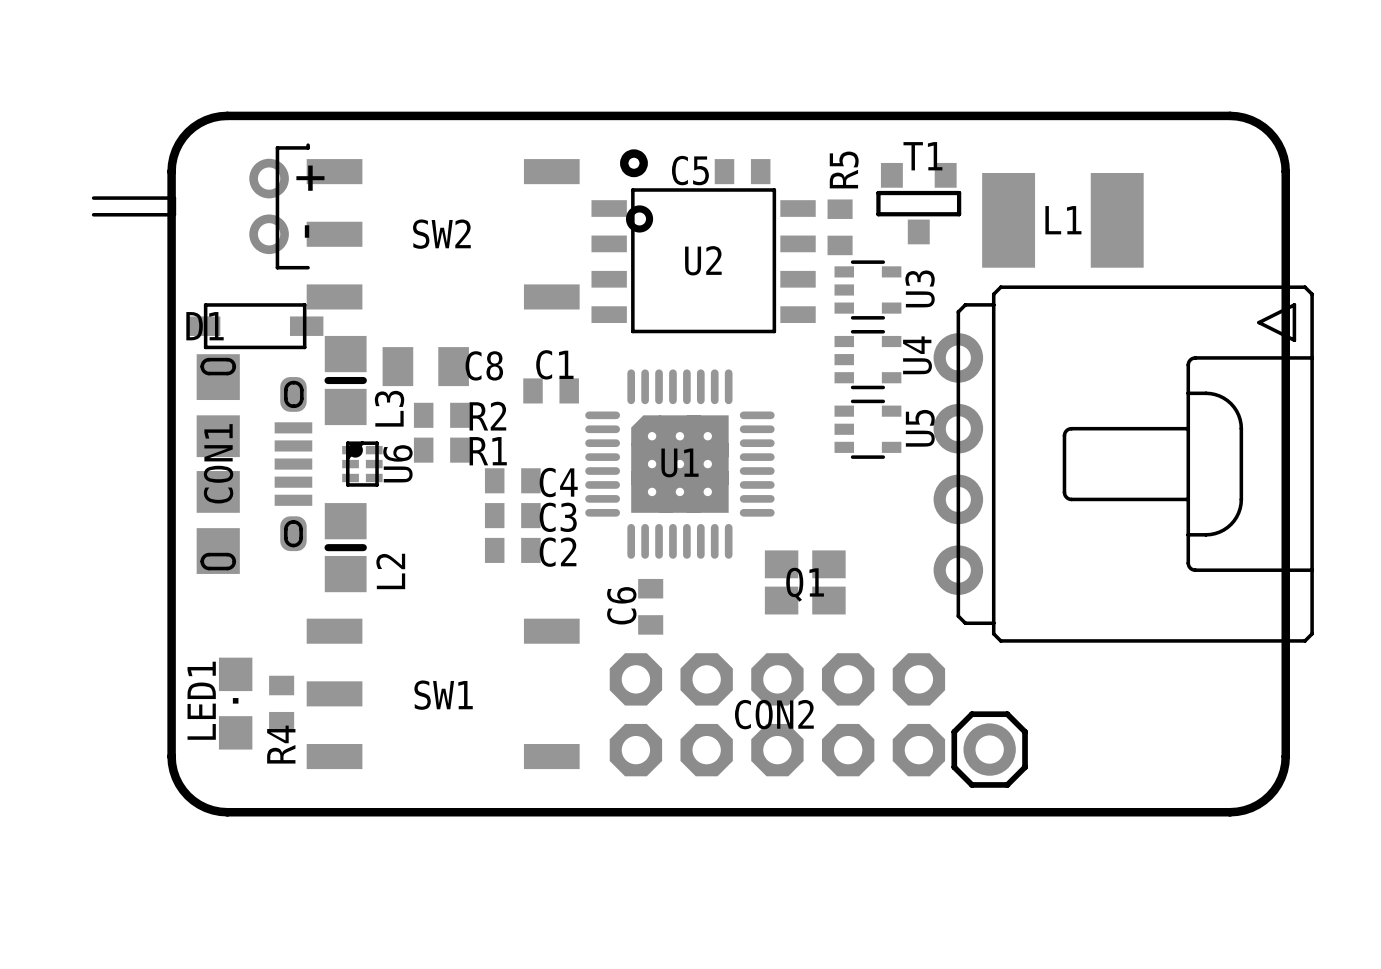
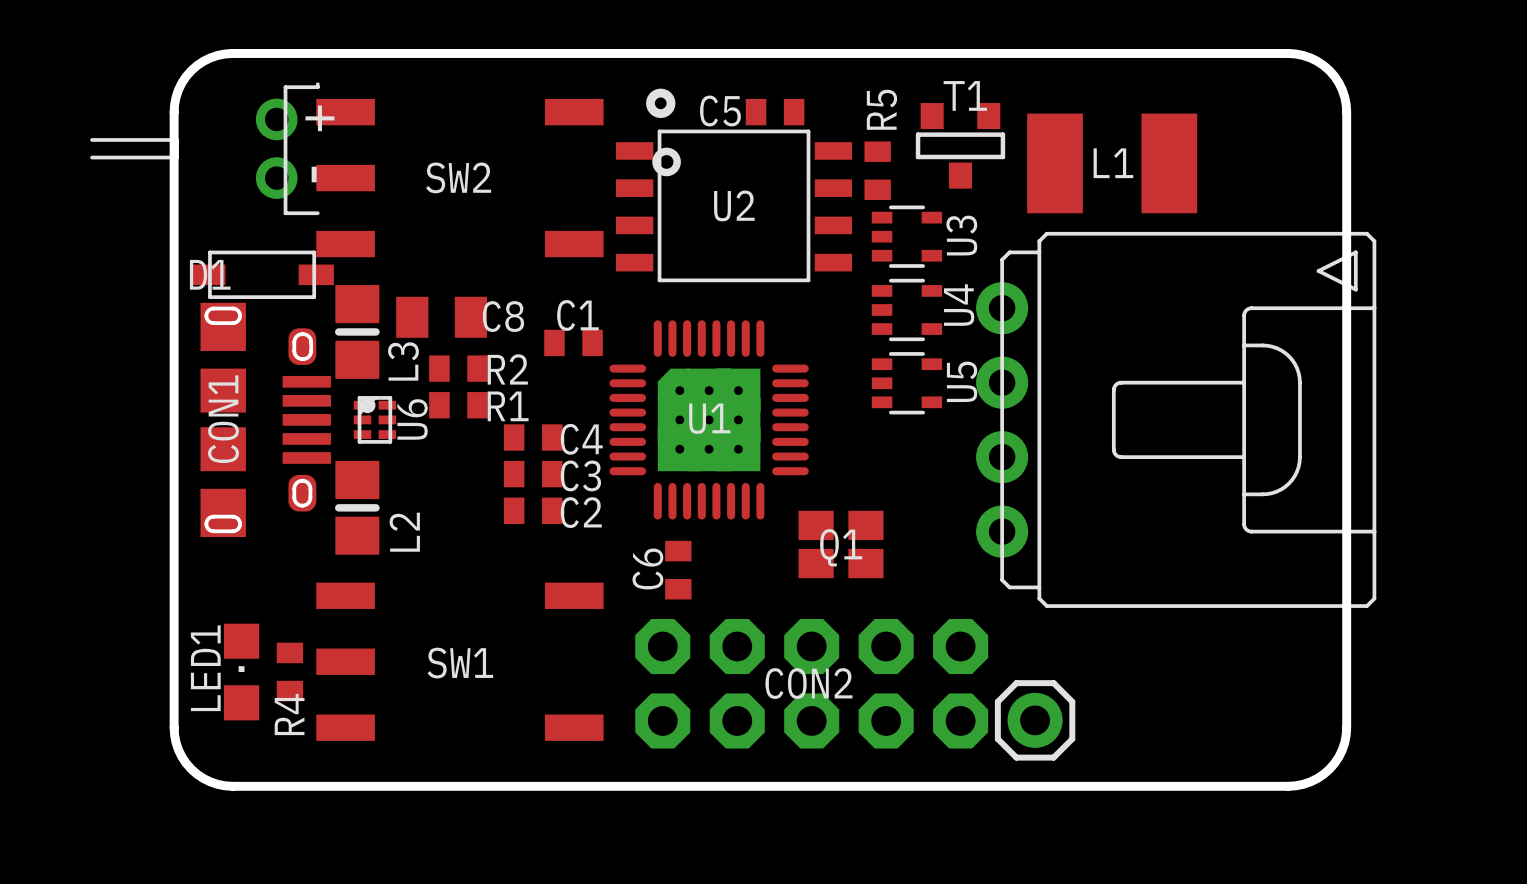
CON1 footprint: [196, 354, 313, 574] -> [200, 302, 331, 538]

